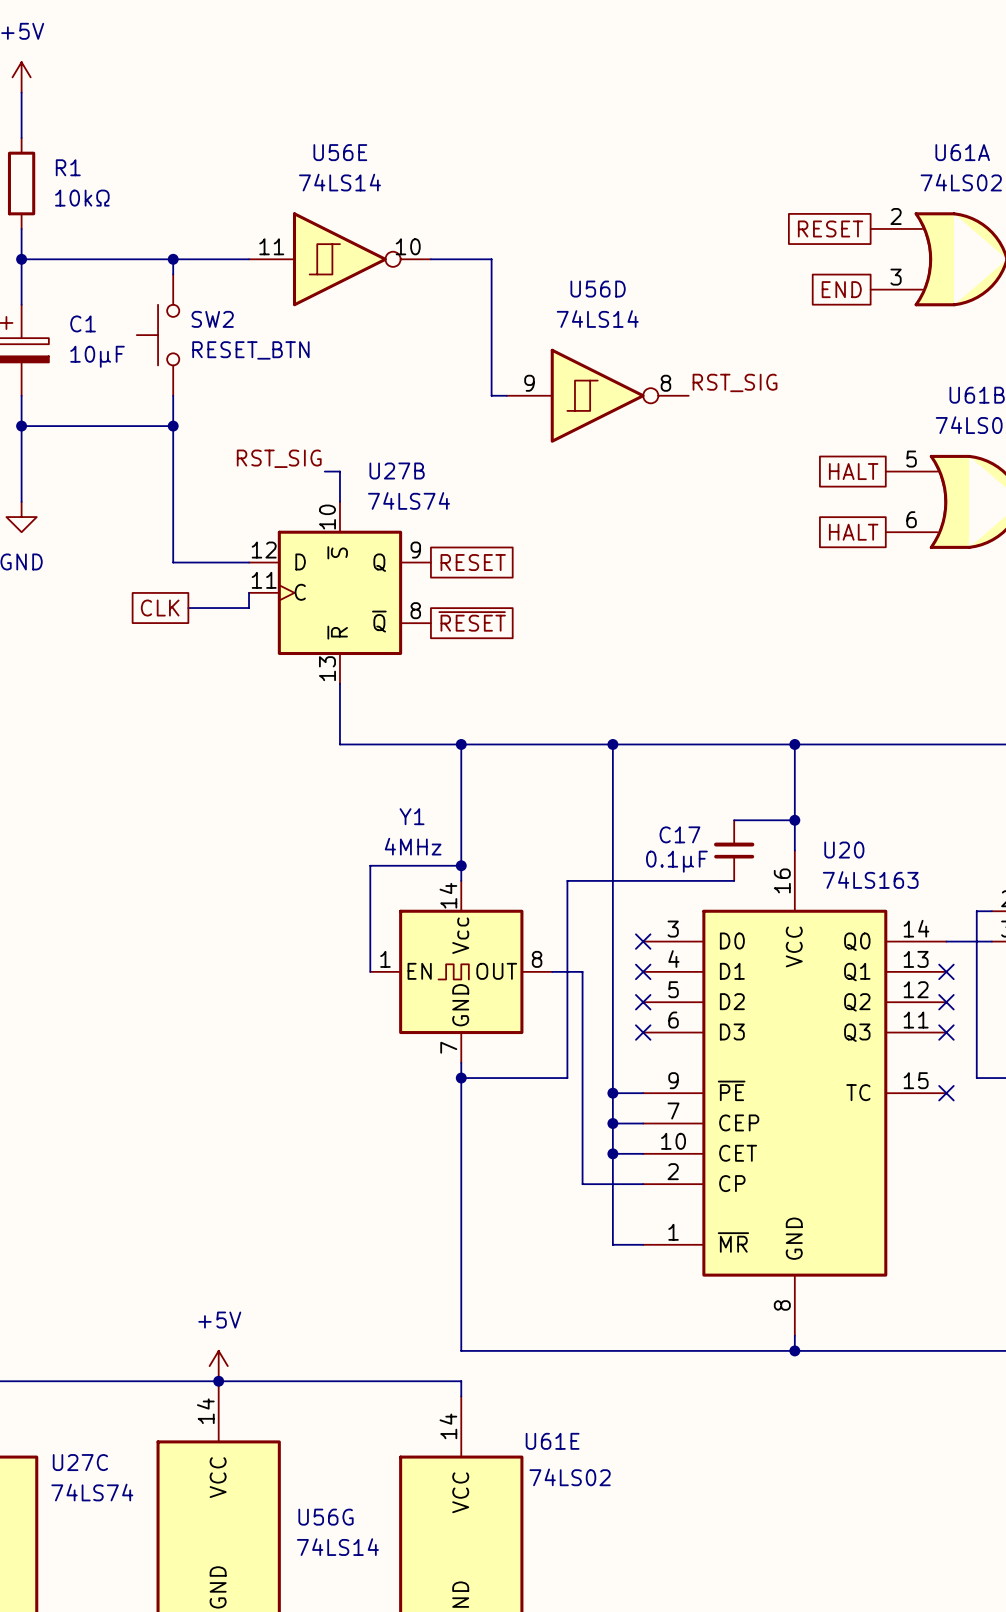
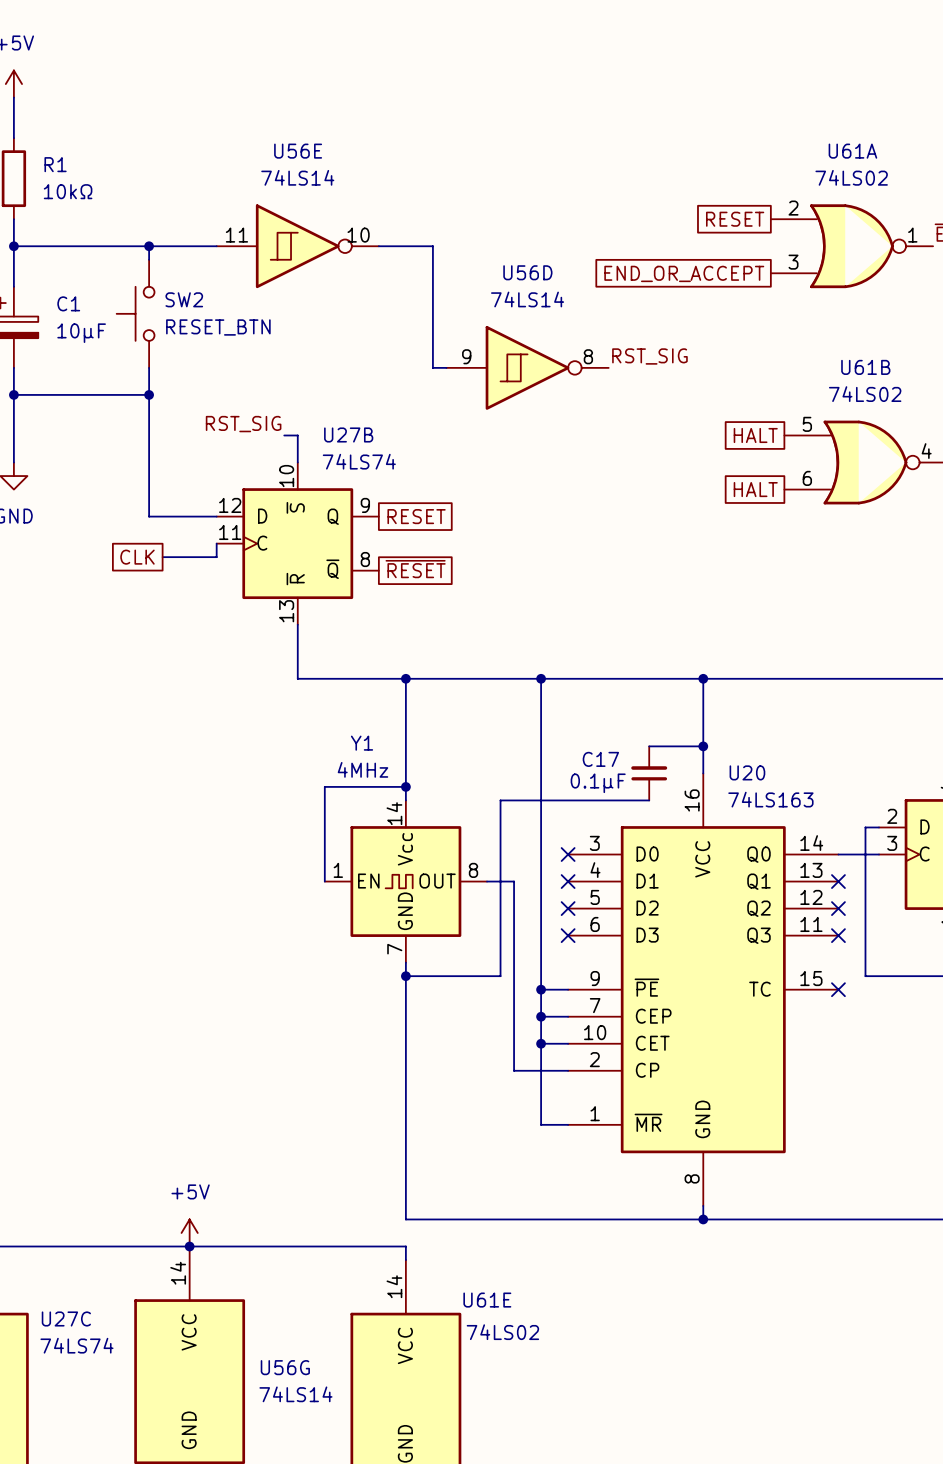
global label: END (841, 289) -> END_OR_ACCEPT (684, 273)

